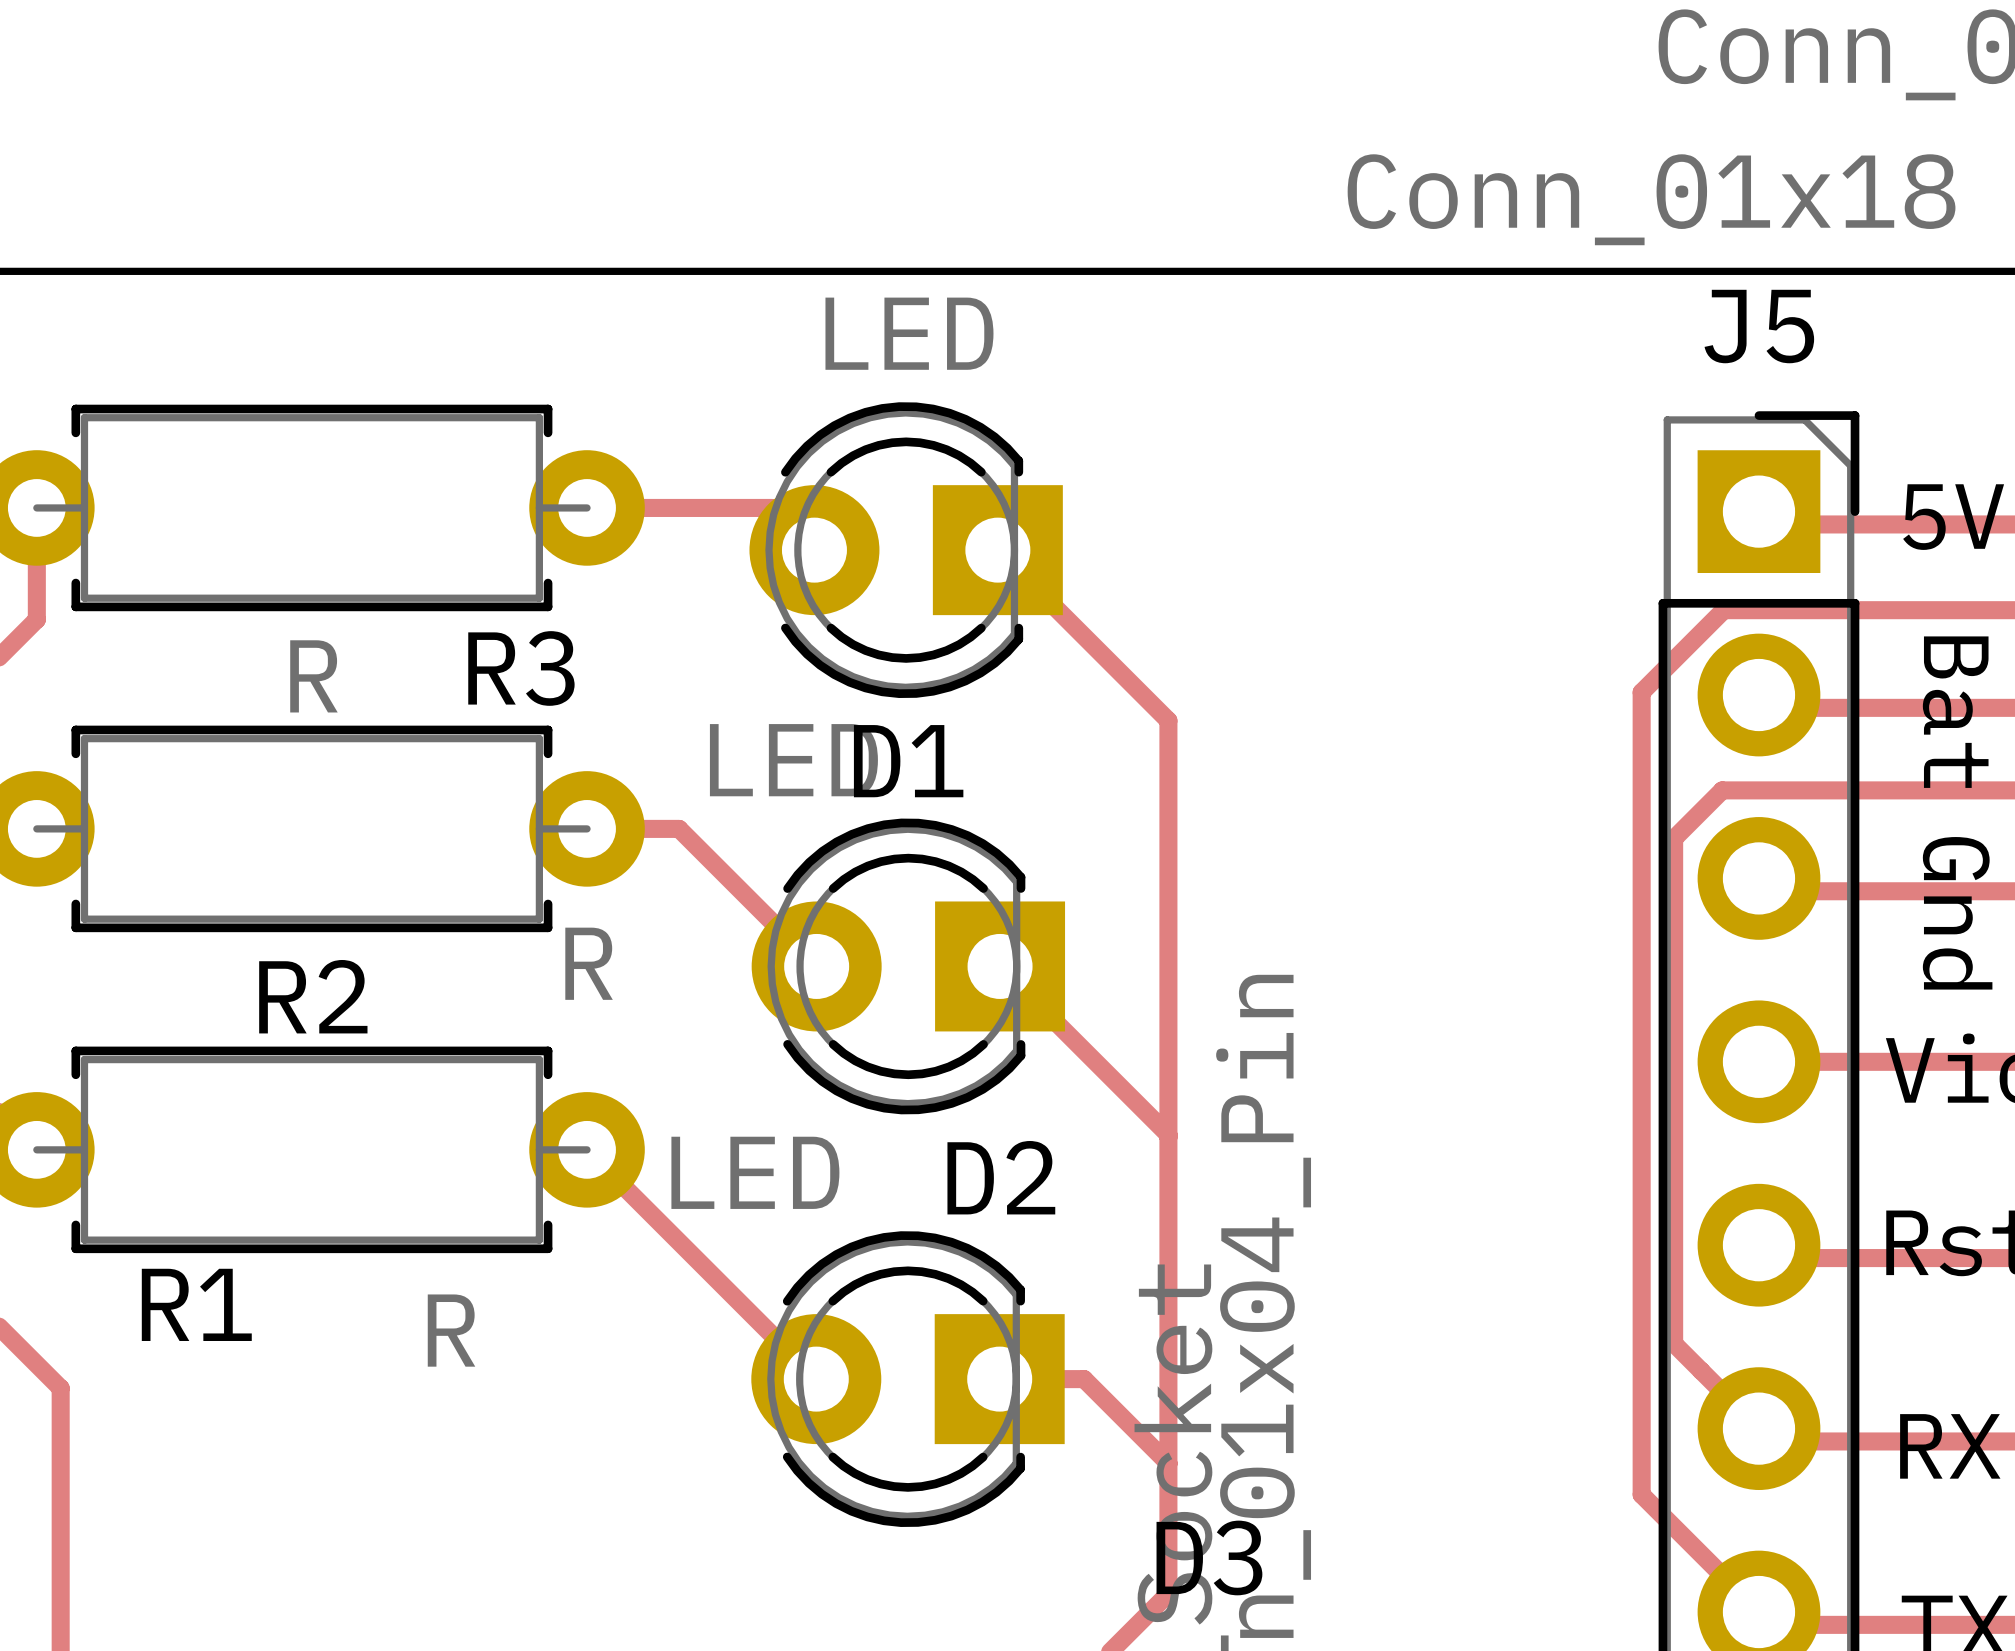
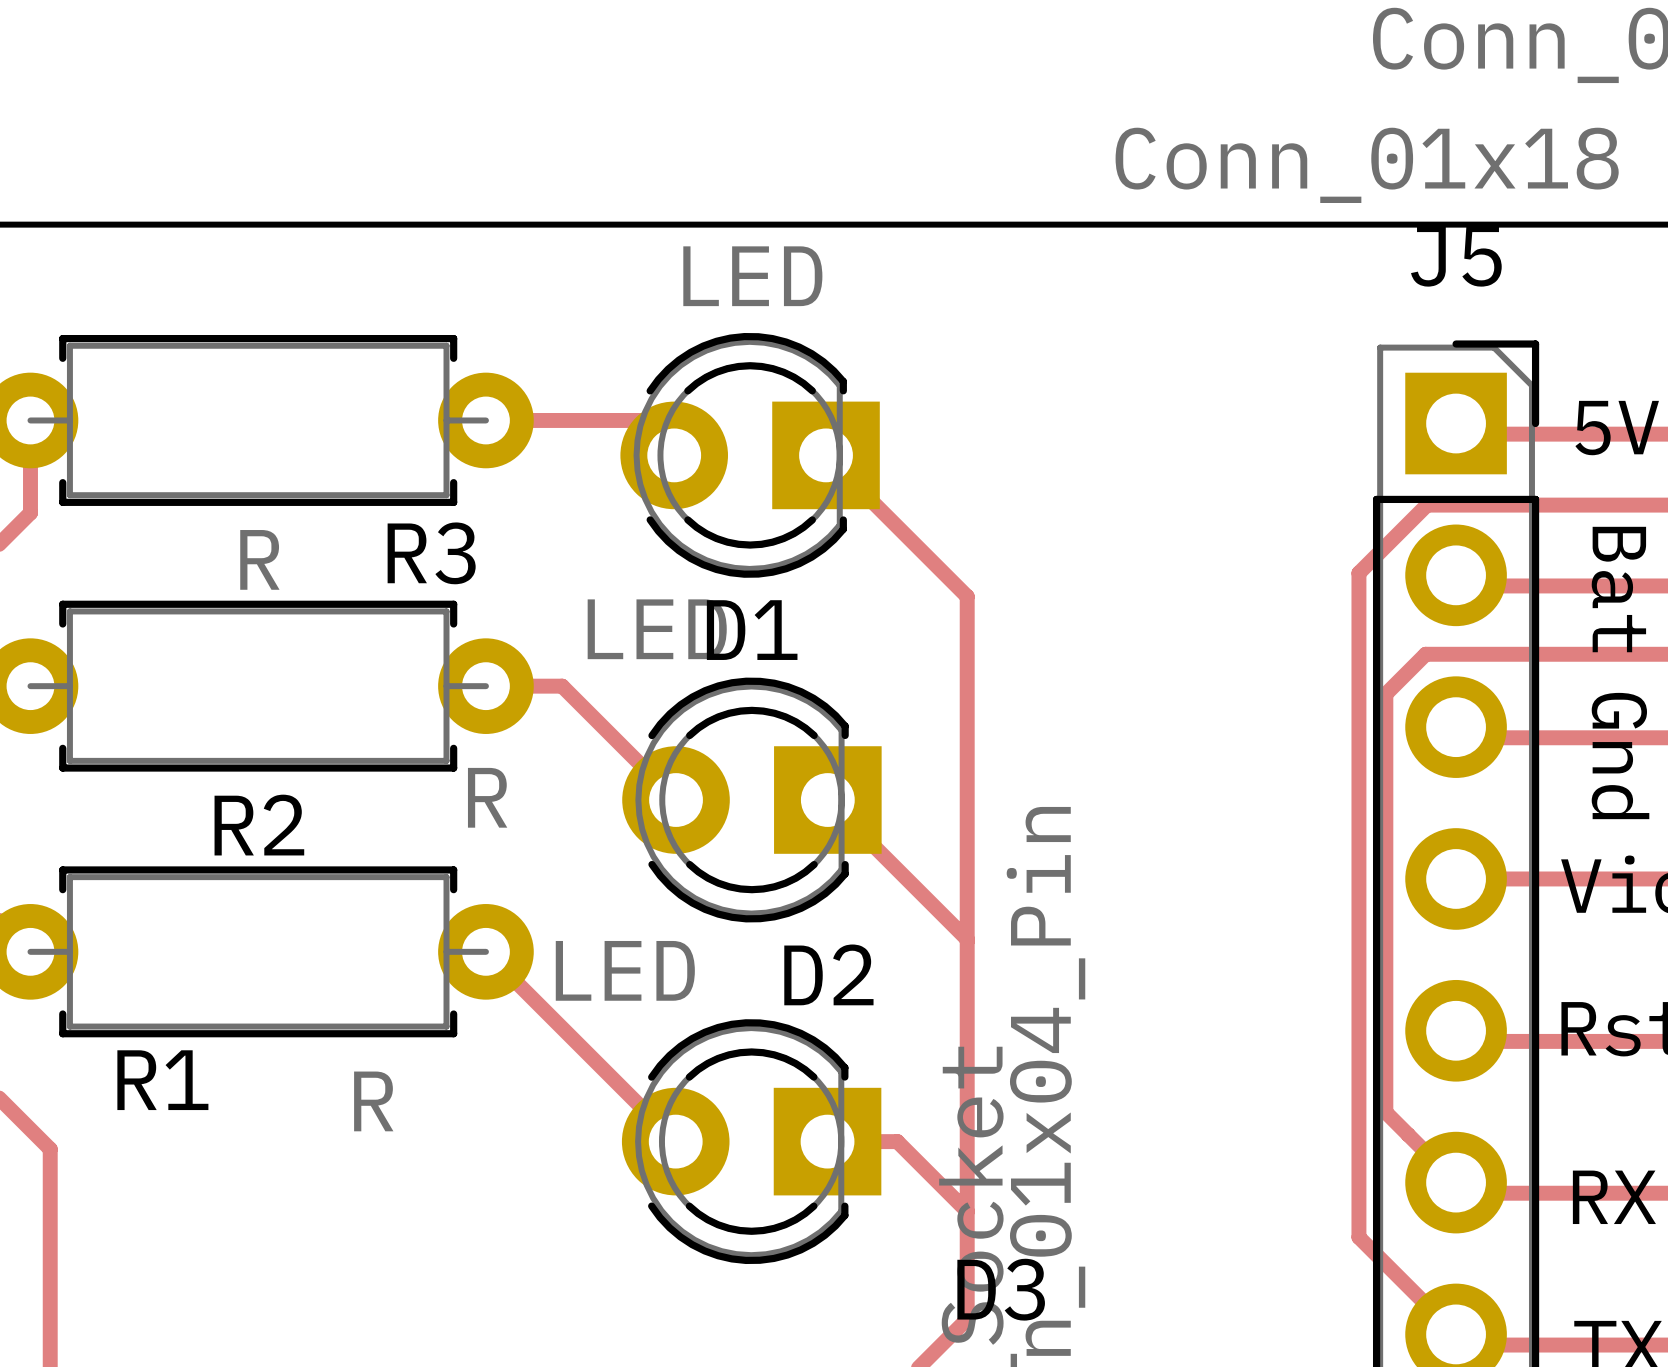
J5 name position: J5 (1759, 326) -> J5 (1456, 256)

